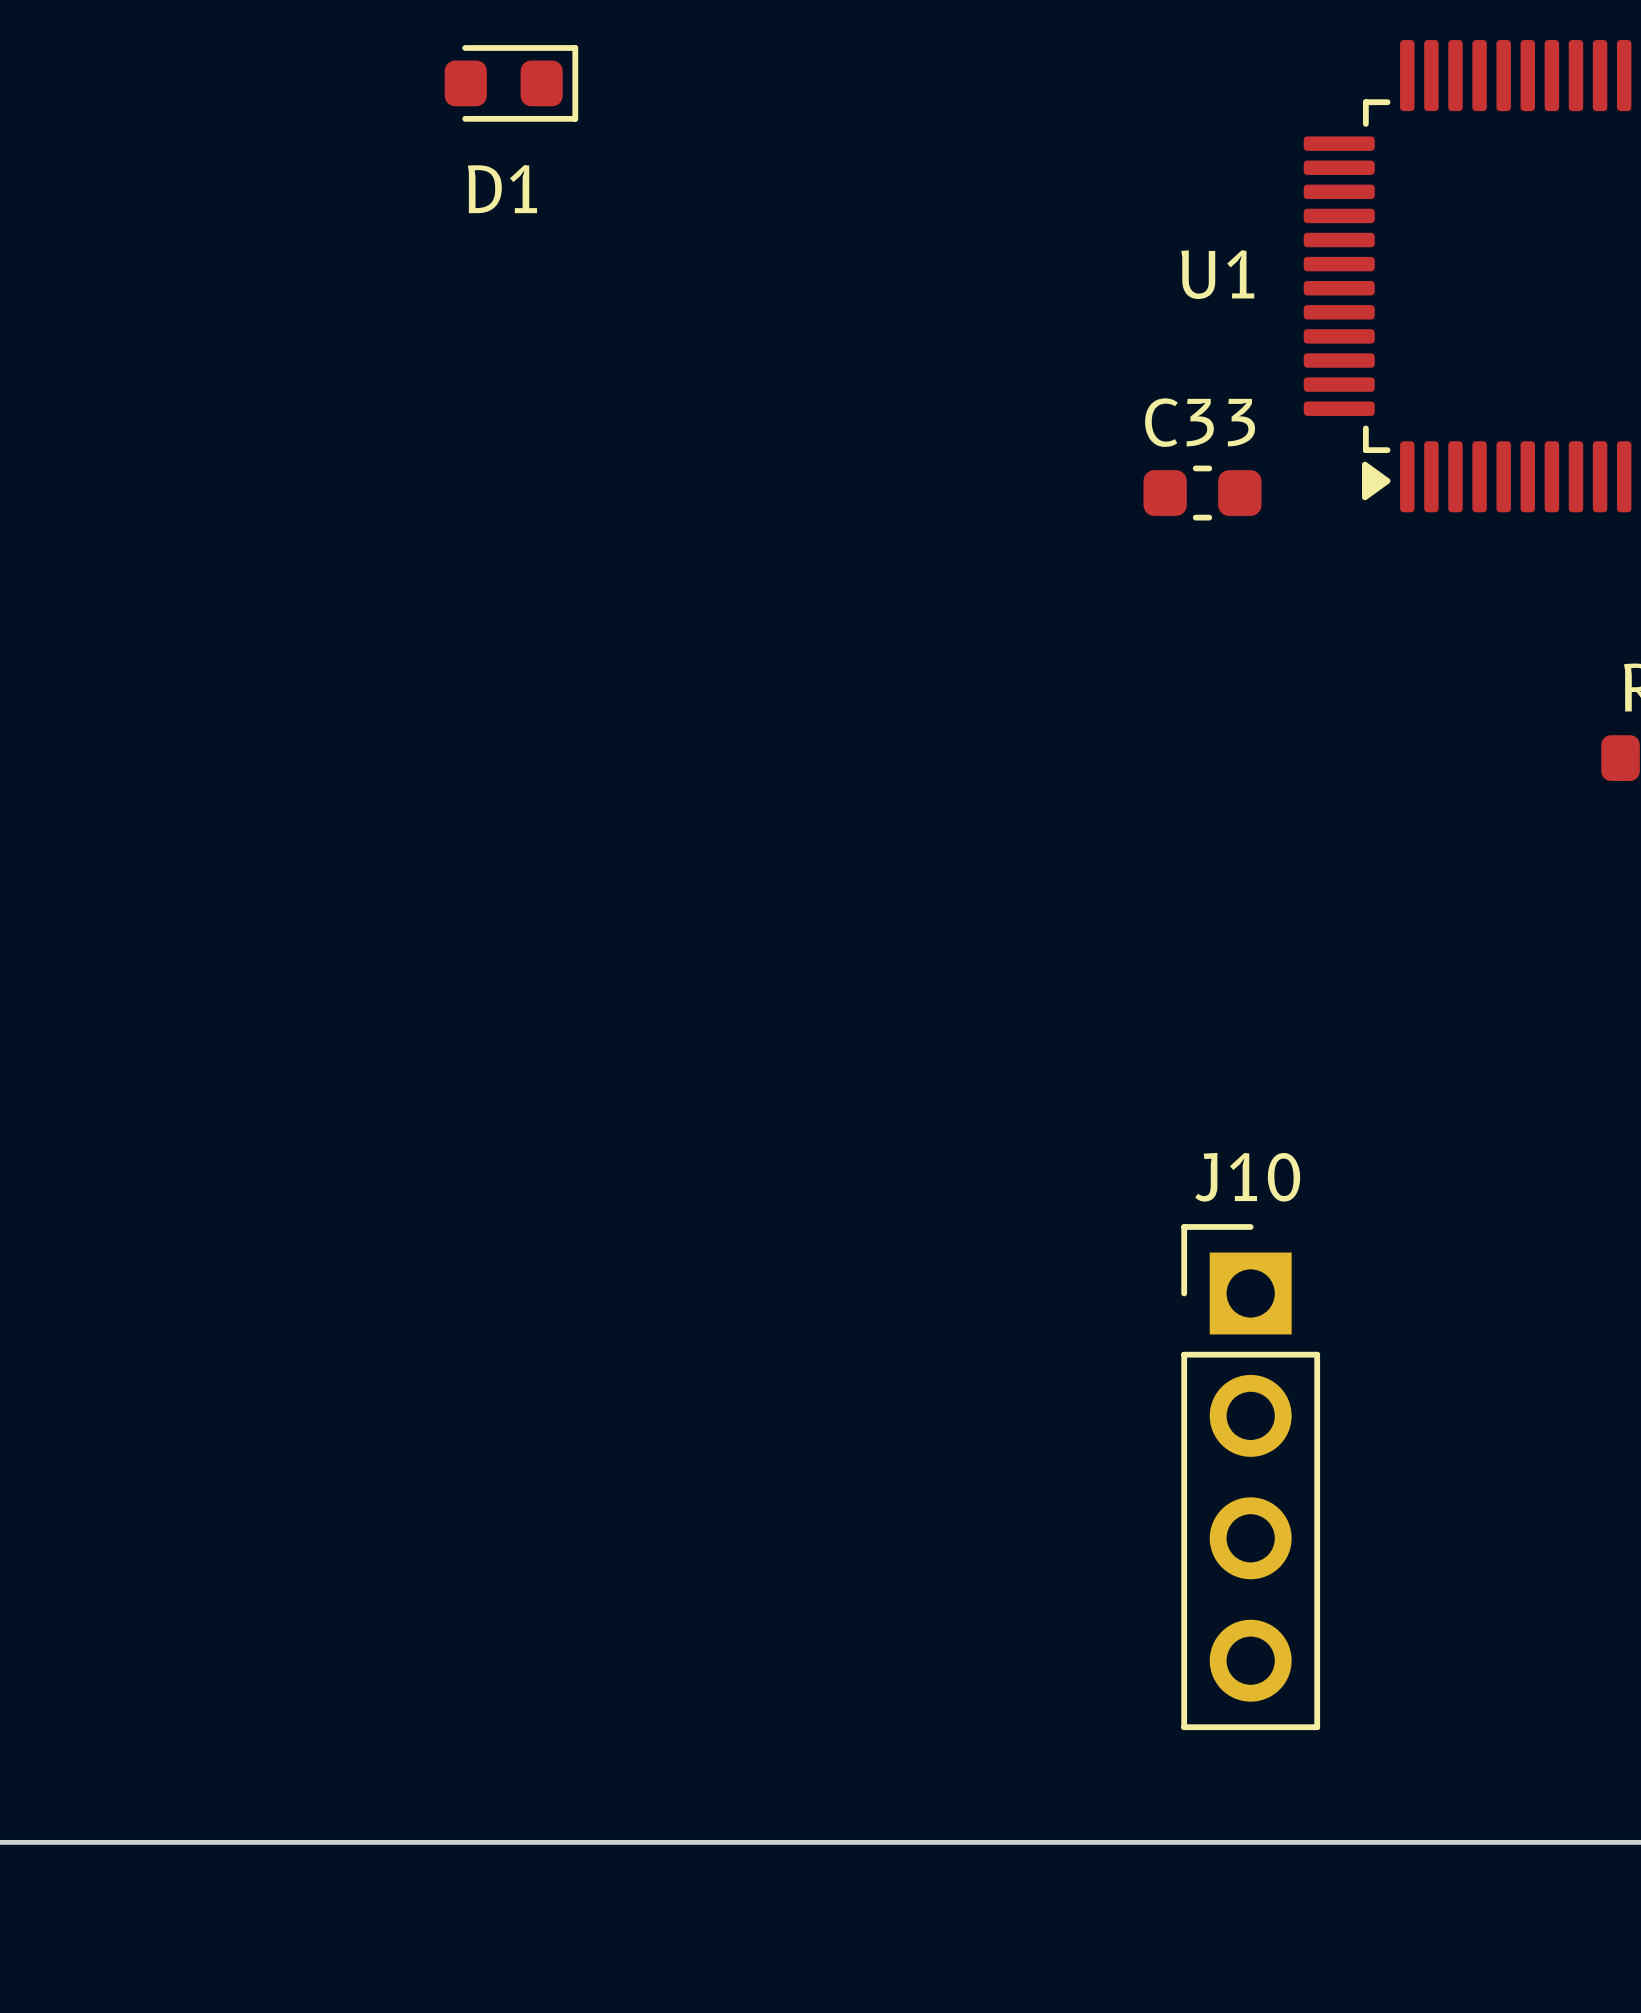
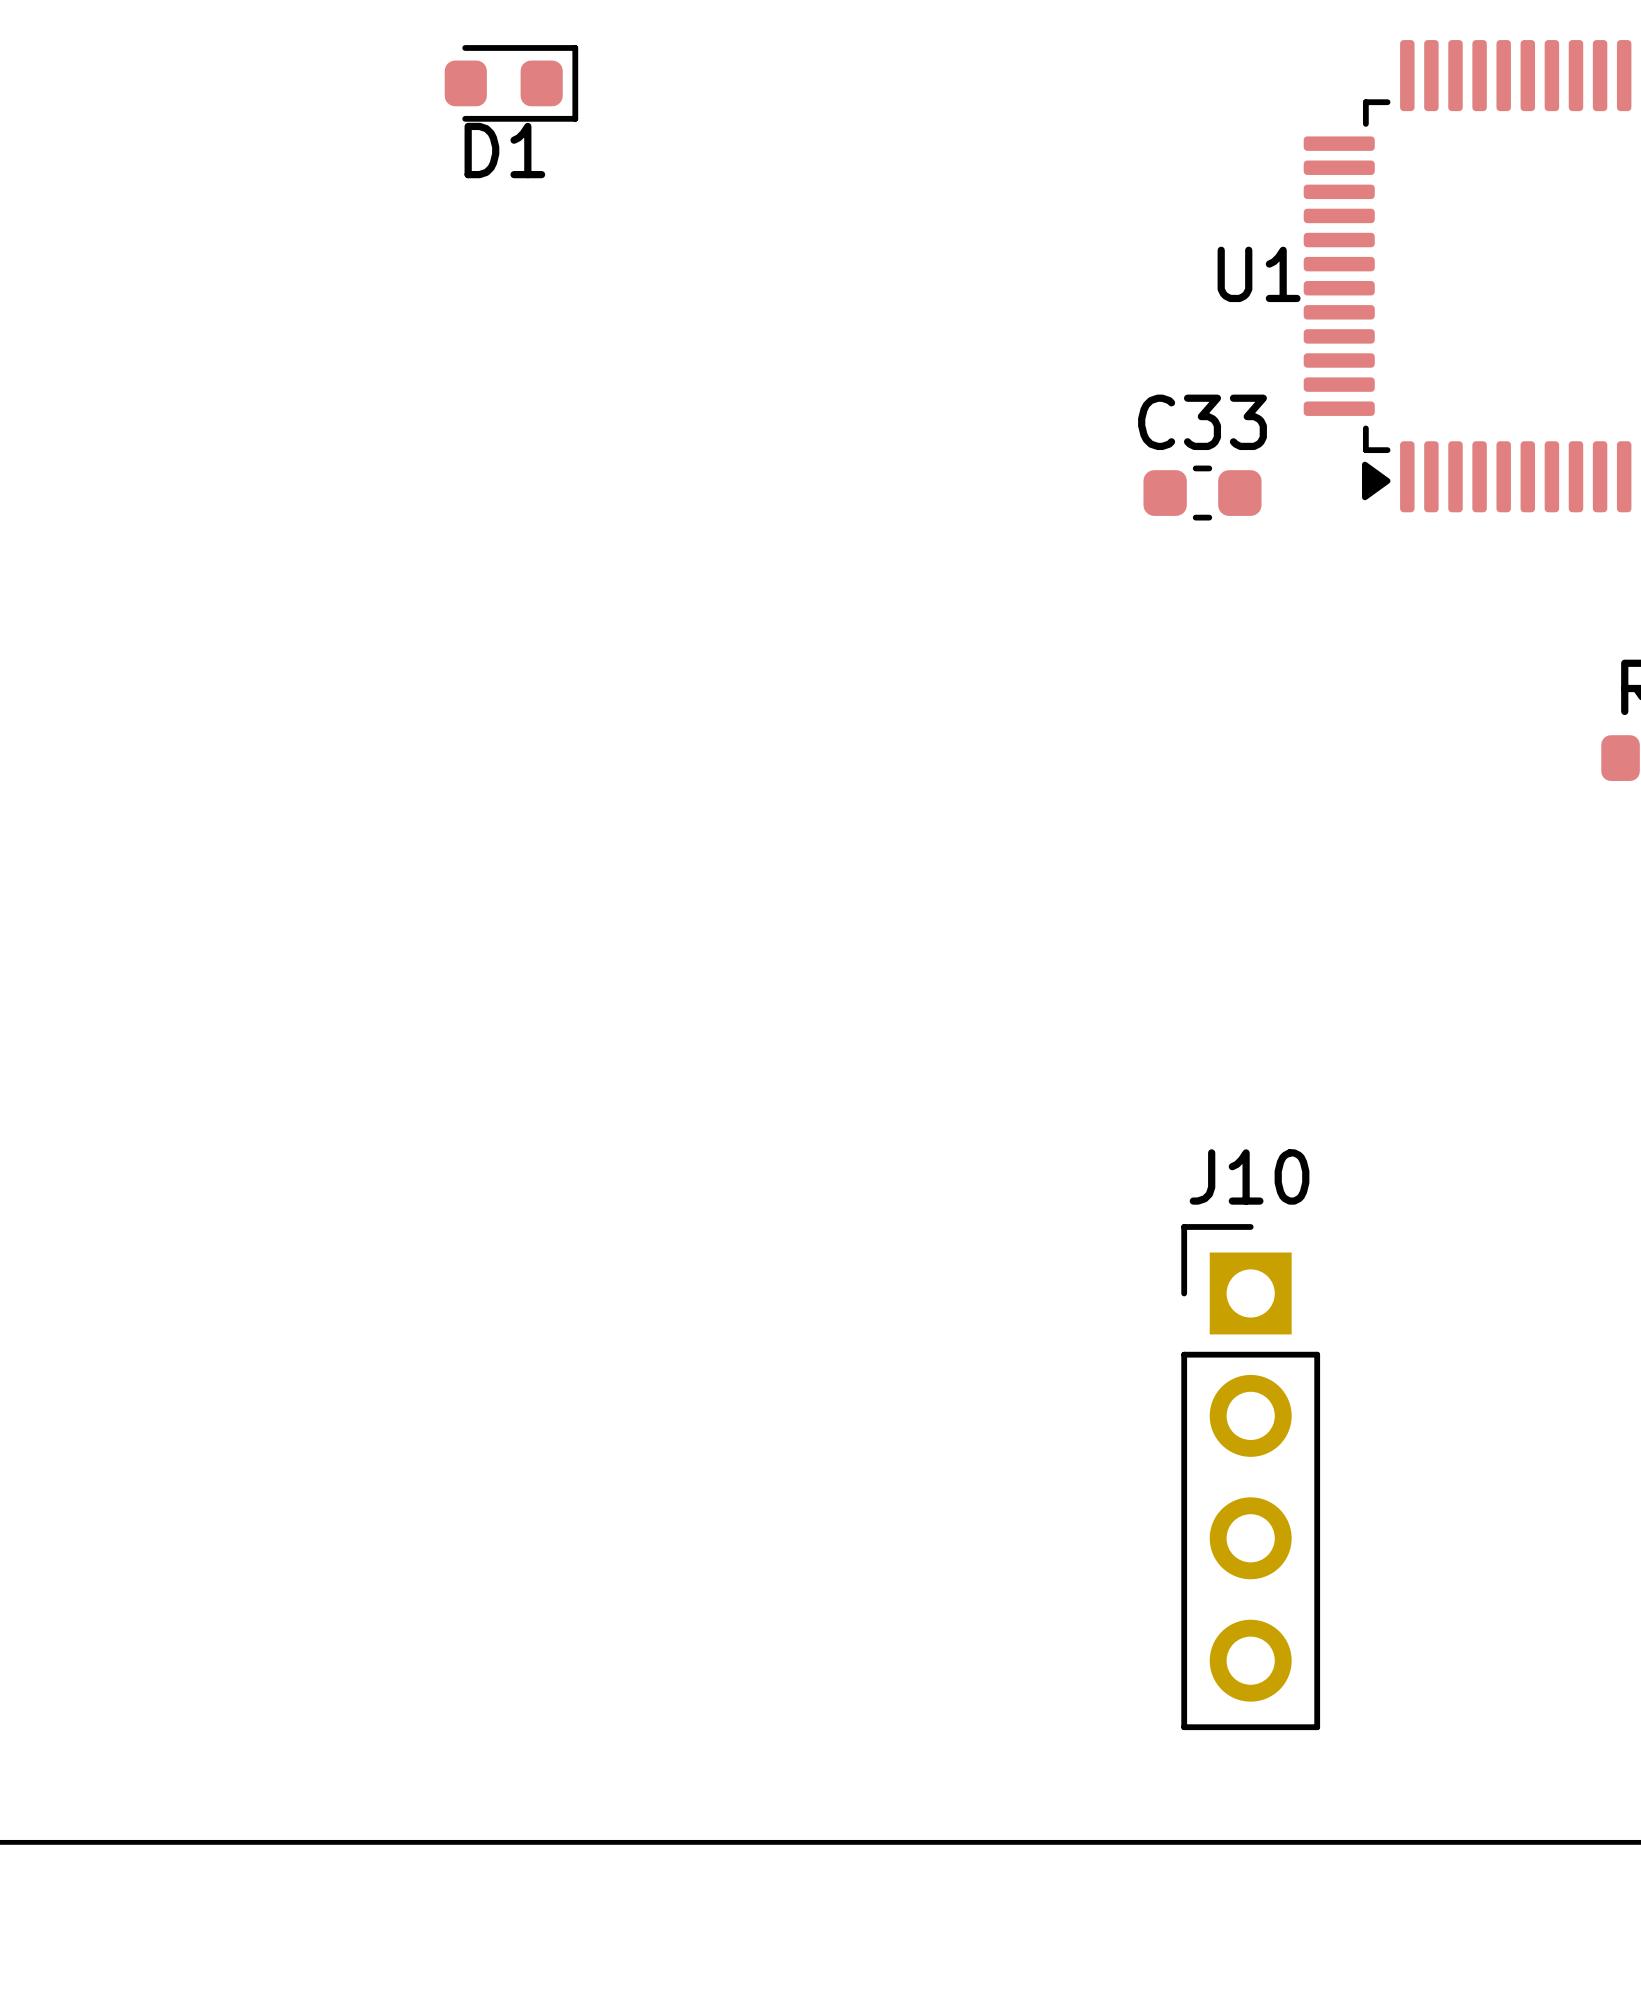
D1 name position: D1 (502, 189) -> D1 (504, 150)
U1 name position: U1 (1217, 274) -> U1 (1259, 274)

